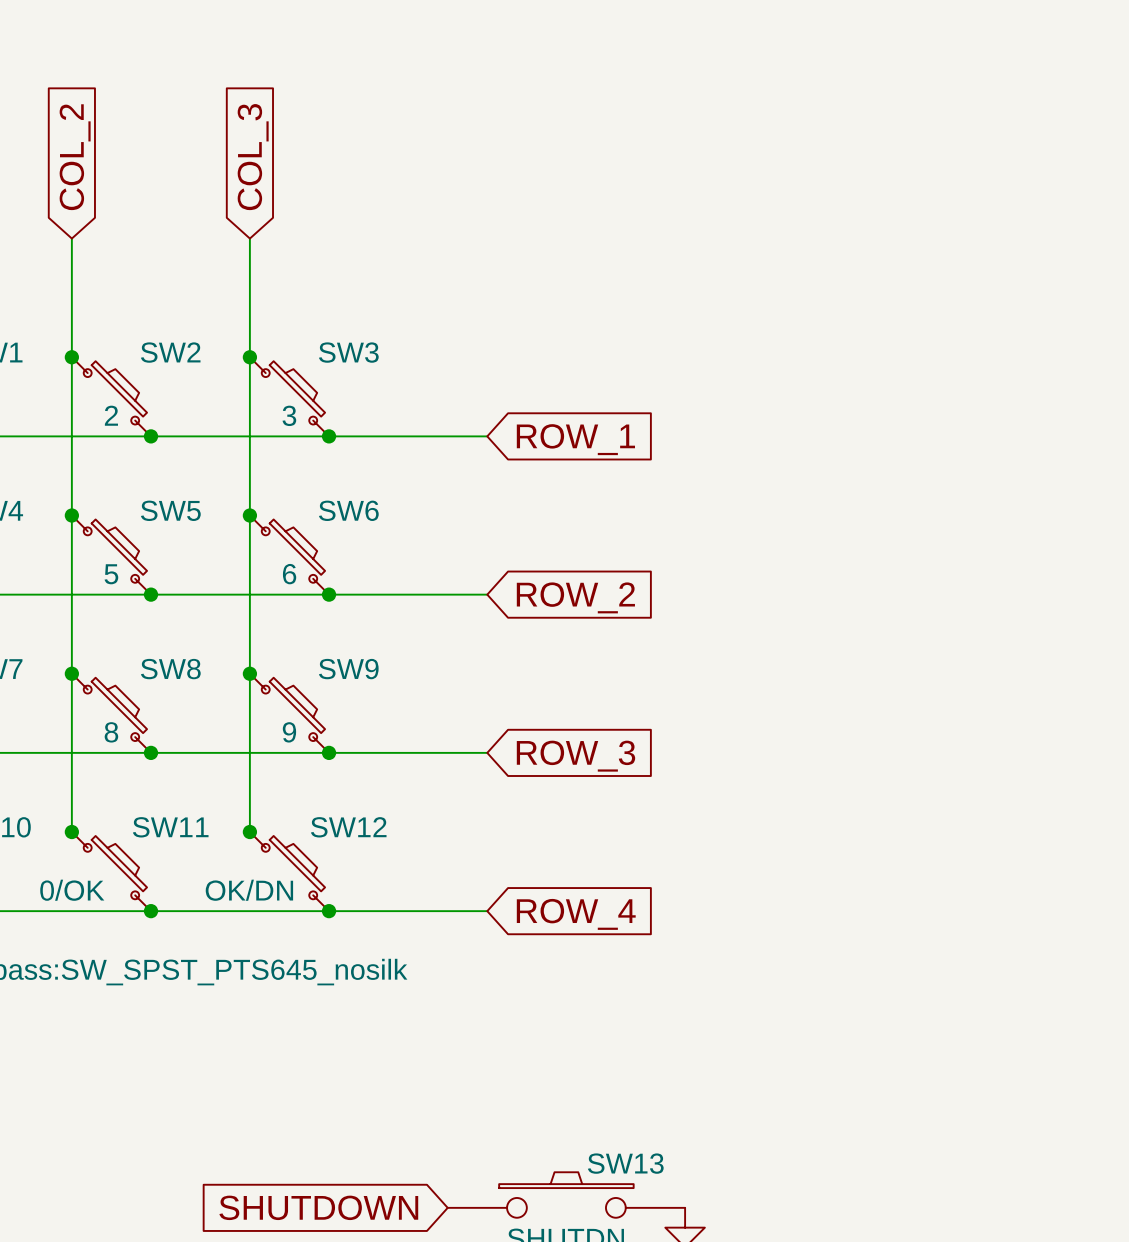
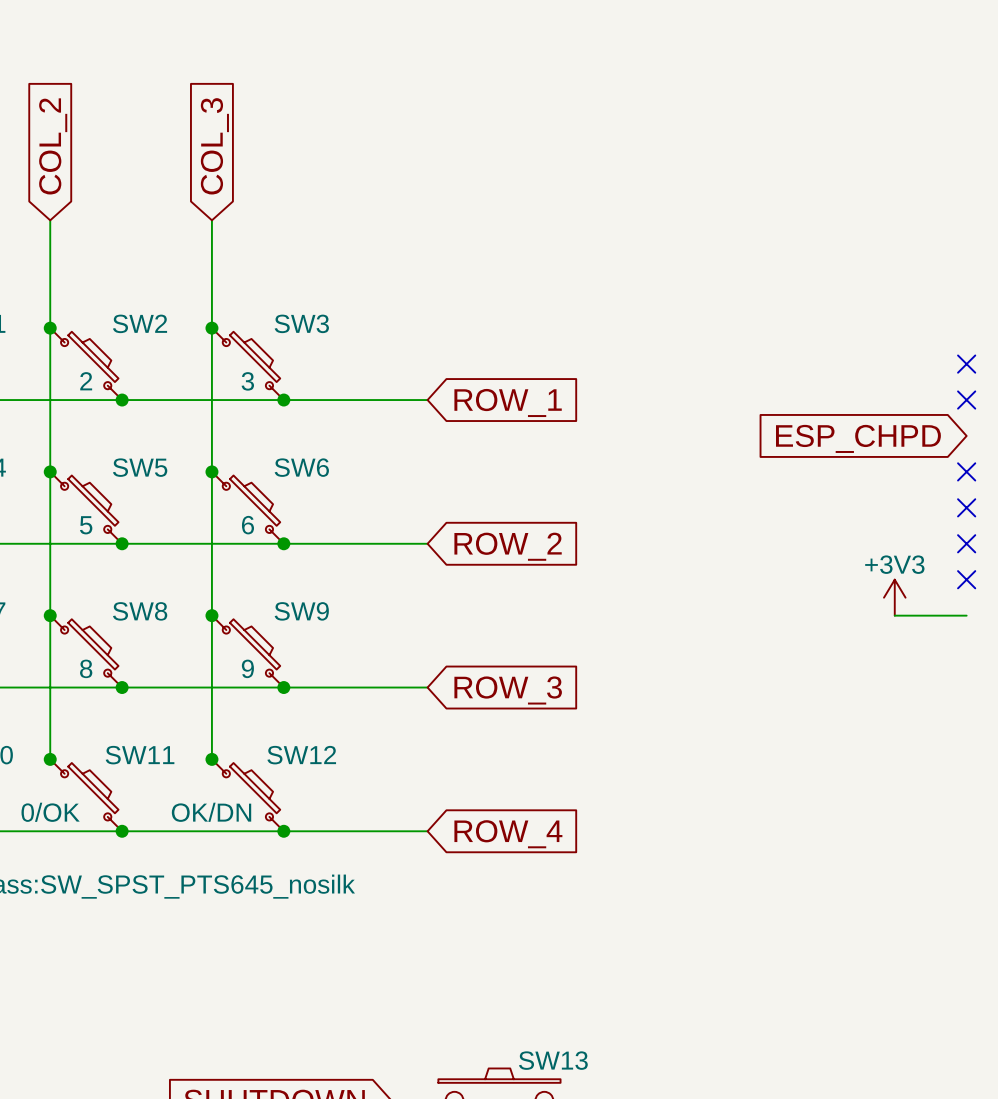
no-connect mark: none -> (966, 364)
no-connect mark: none -> (966, 400)
global label: none -> ESP_CHPD (858, 438)
no-connect mark: none -> (966, 471)
no-connect mark: none -> (966, 507)
no-connect mark: none -> (966, 543)
no-connect mark: none -> (966, 579)
power symbol: none -> +3V3 (894, 597)
wire: none -> (894, 615) (966, 615)

